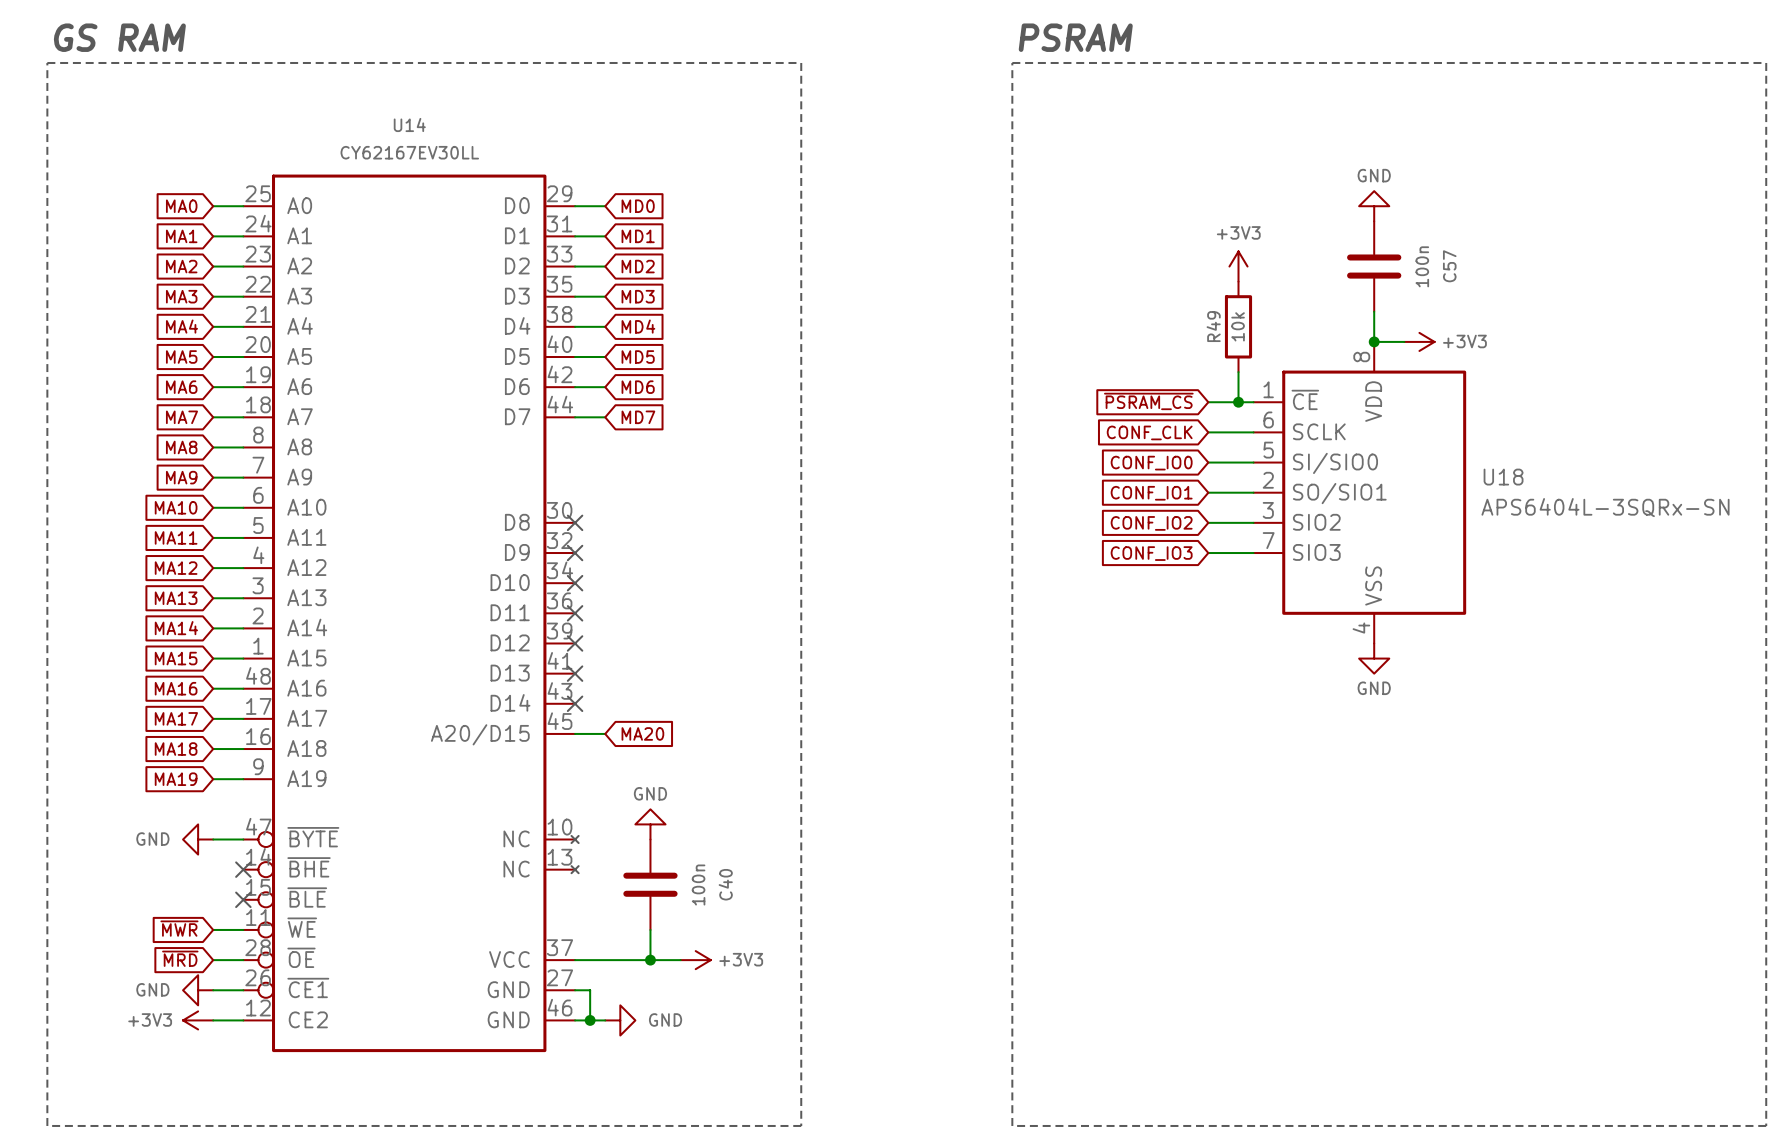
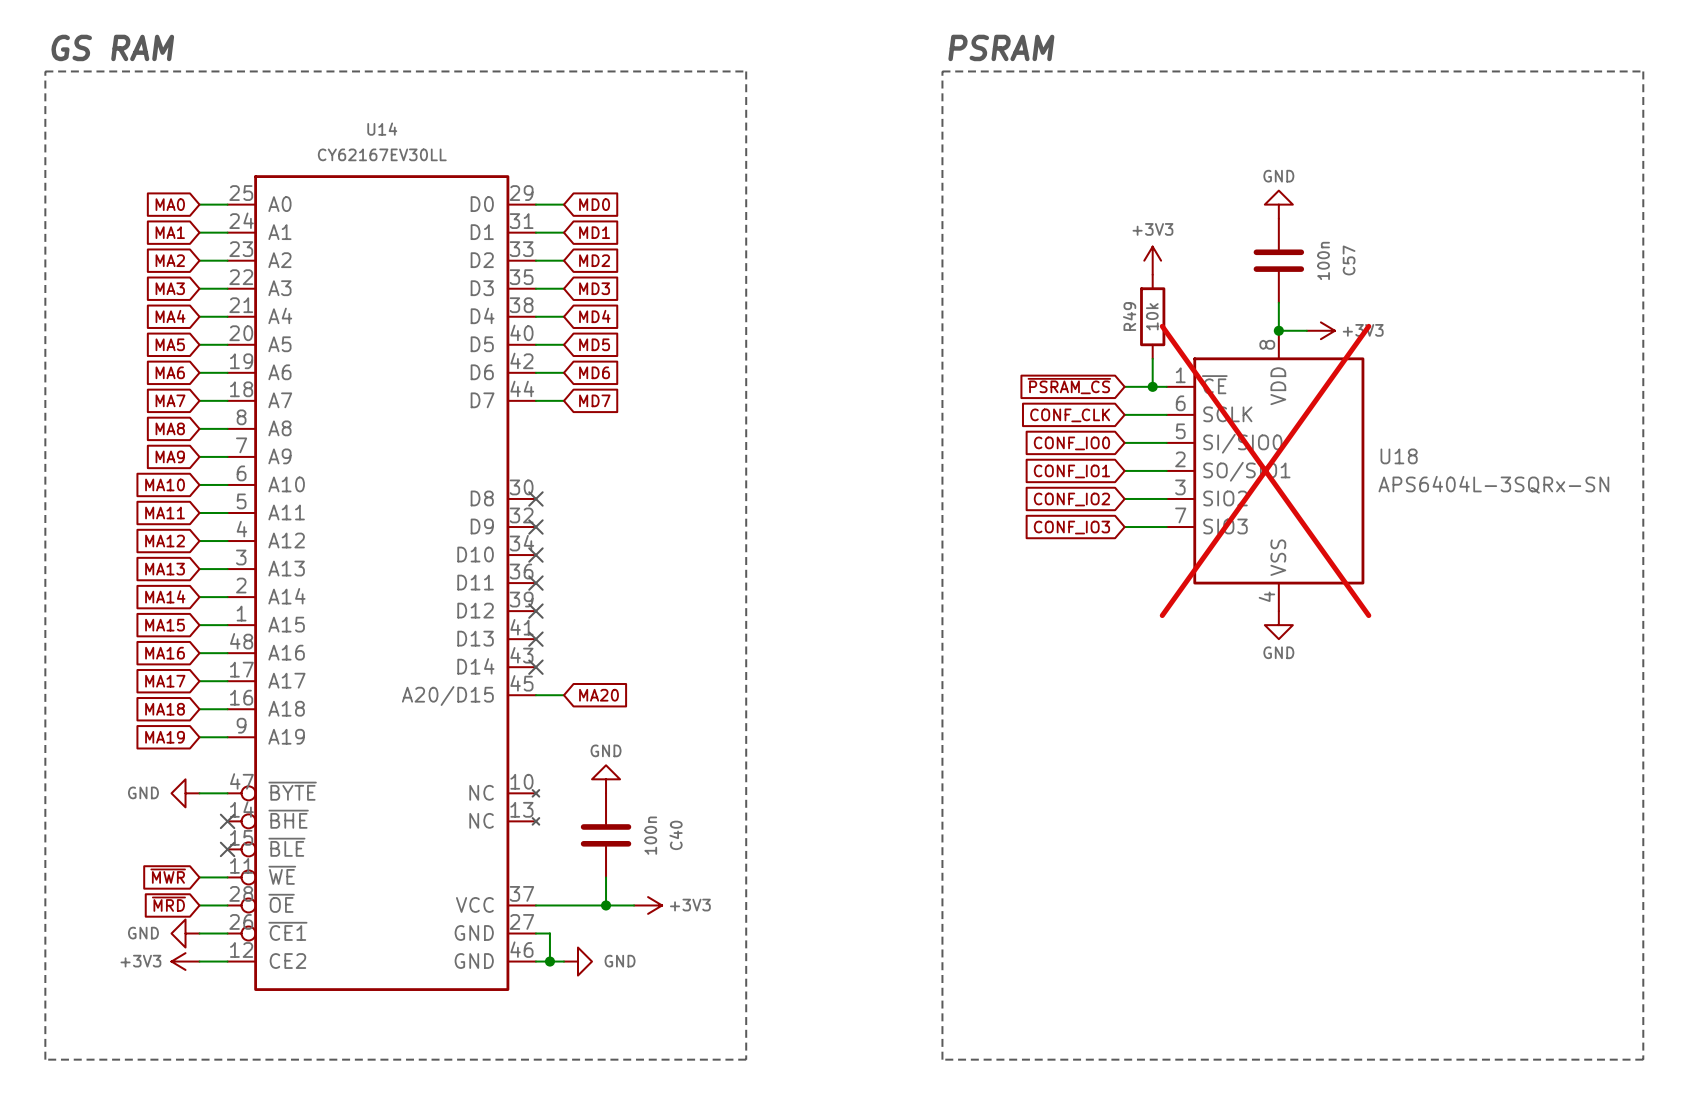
U18 do-not-place cross: none -> (1265, 470)

